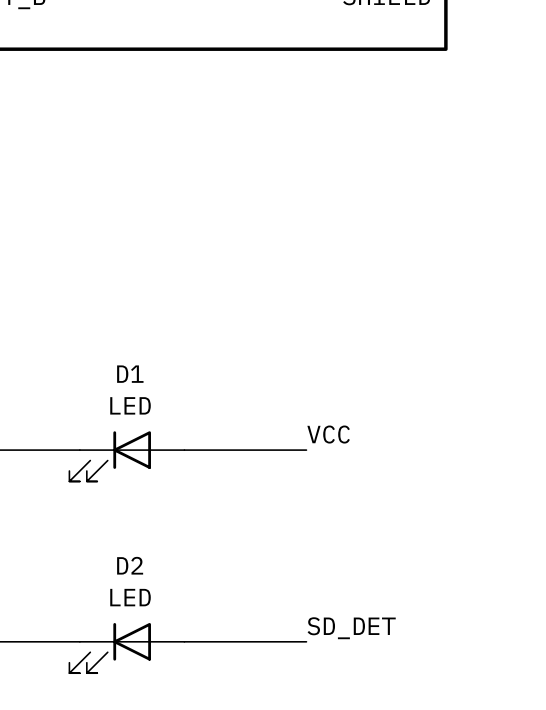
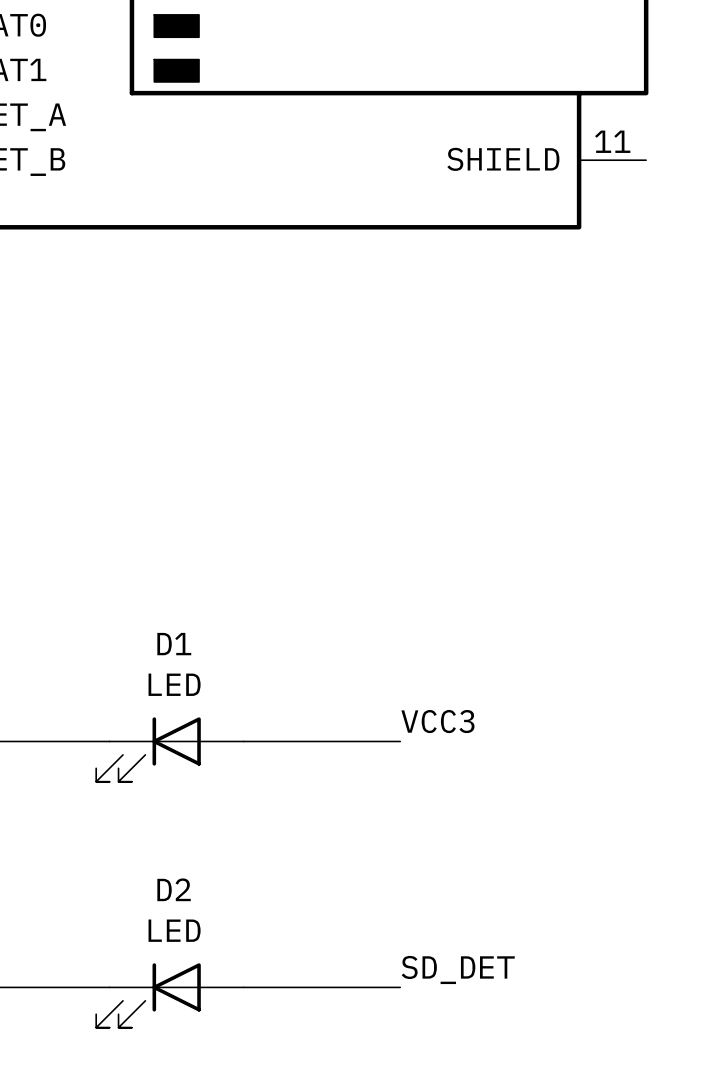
label: VCC (328, 434) -> VCC3 (437, 721)

